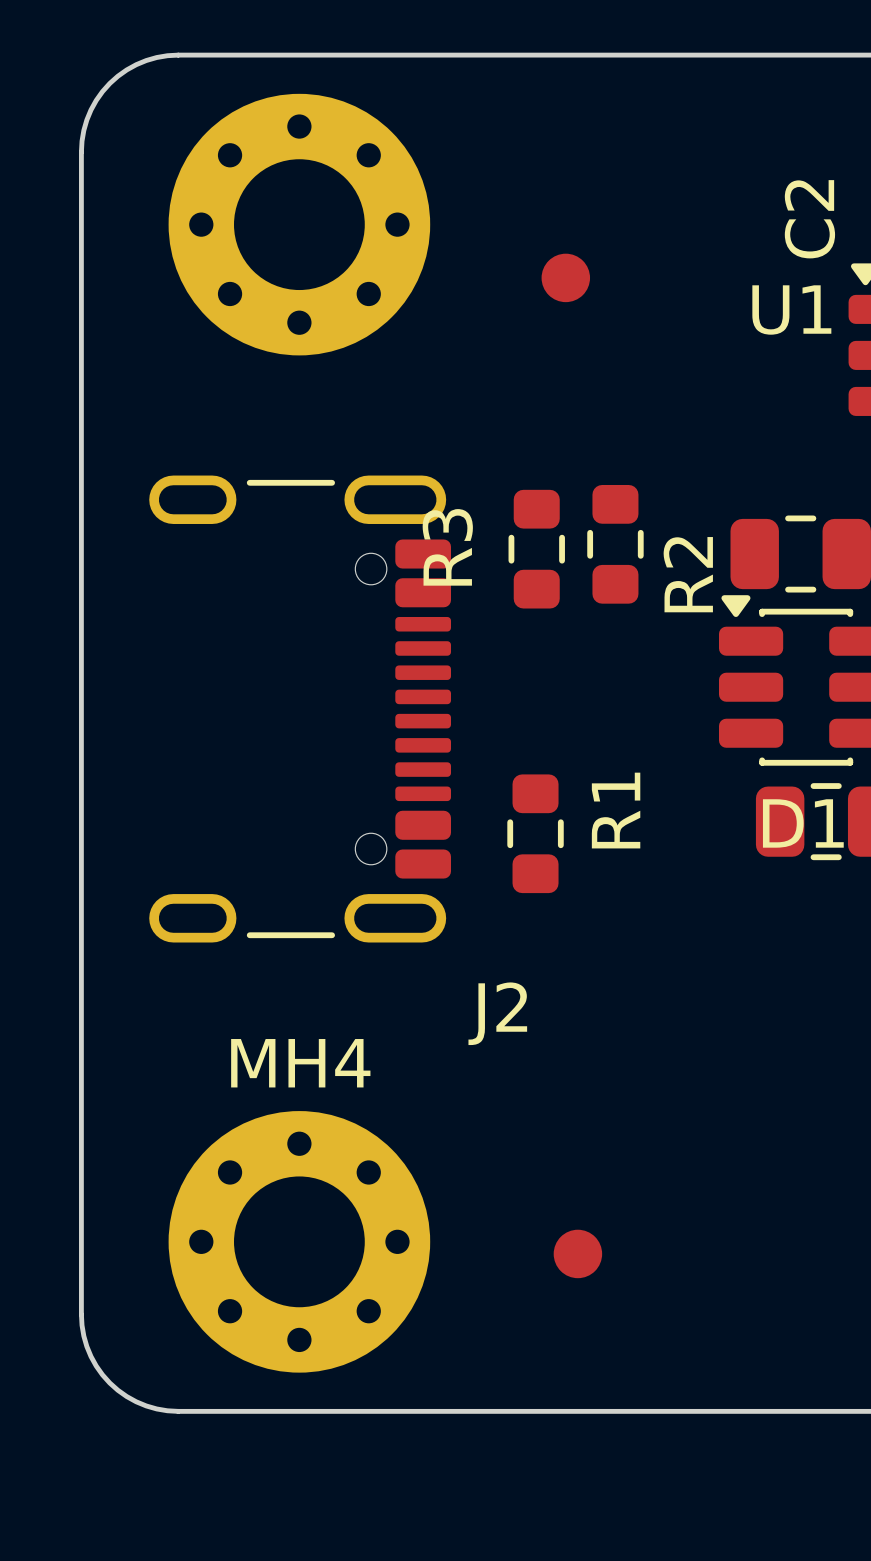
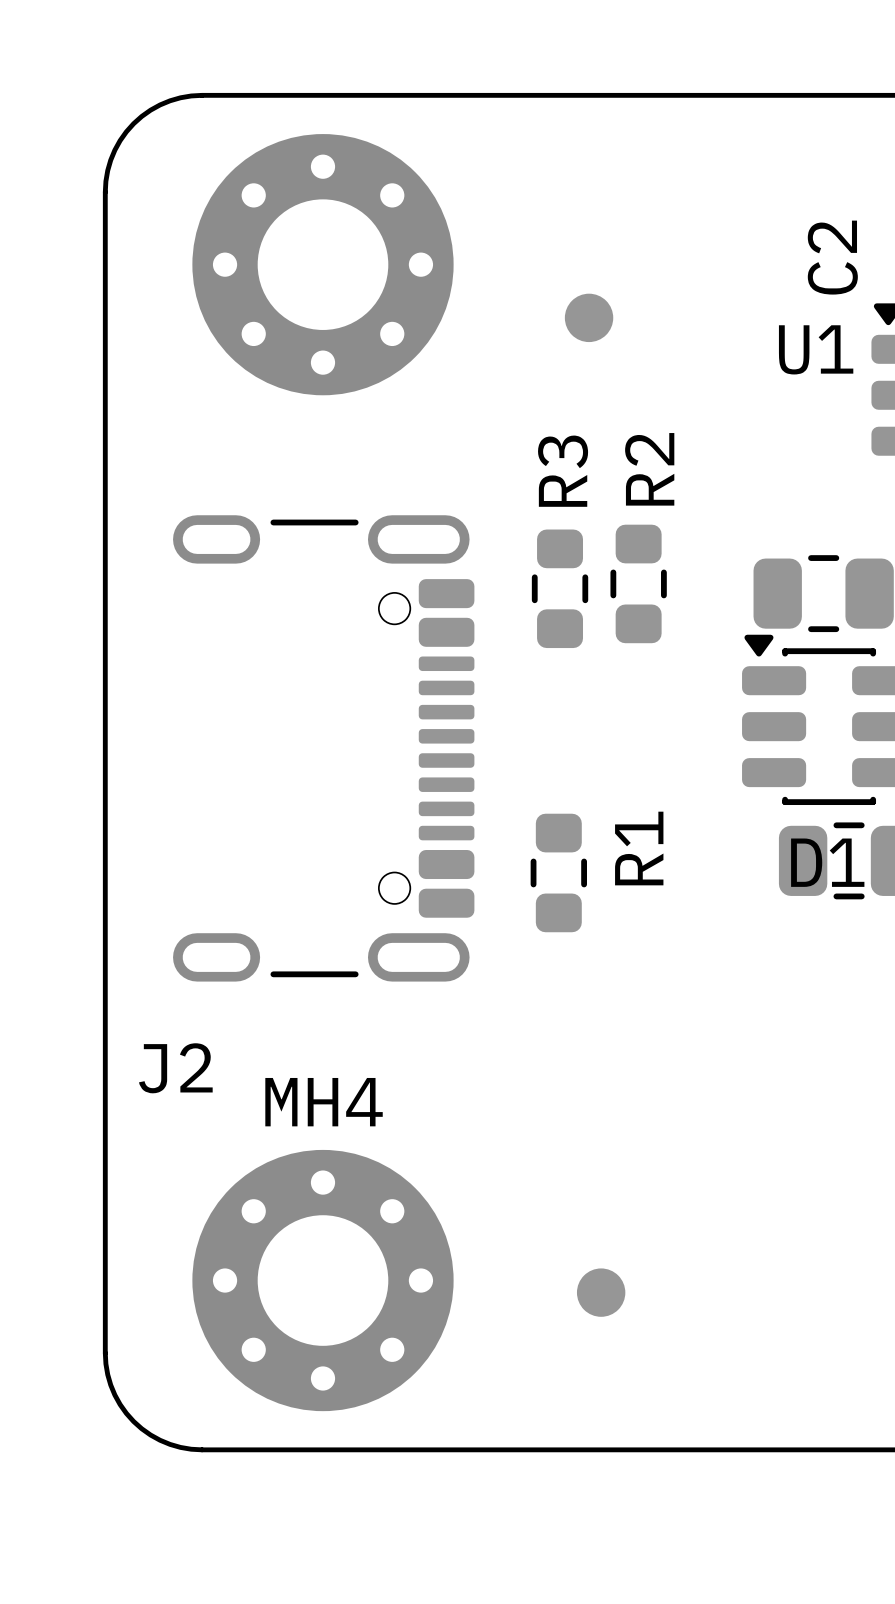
R3 name position: R3 (447, 547) -> R3 (563, 471)
R2 name position: R2 (688, 574) -> R2 (649, 469)
J2 name position: J2 (497, 1013) -> J2 (175, 1068)

